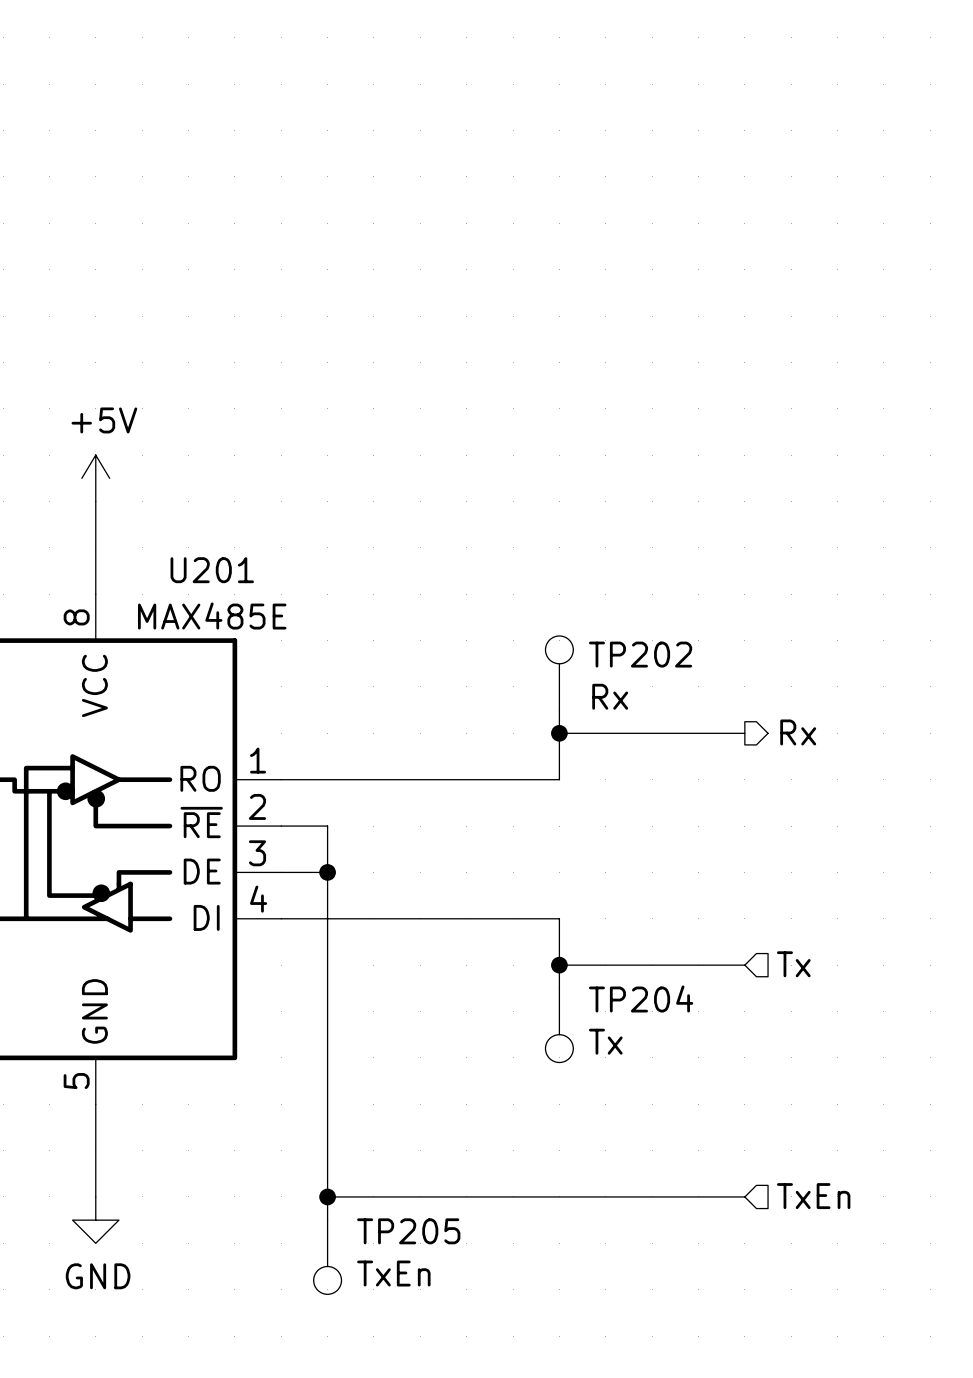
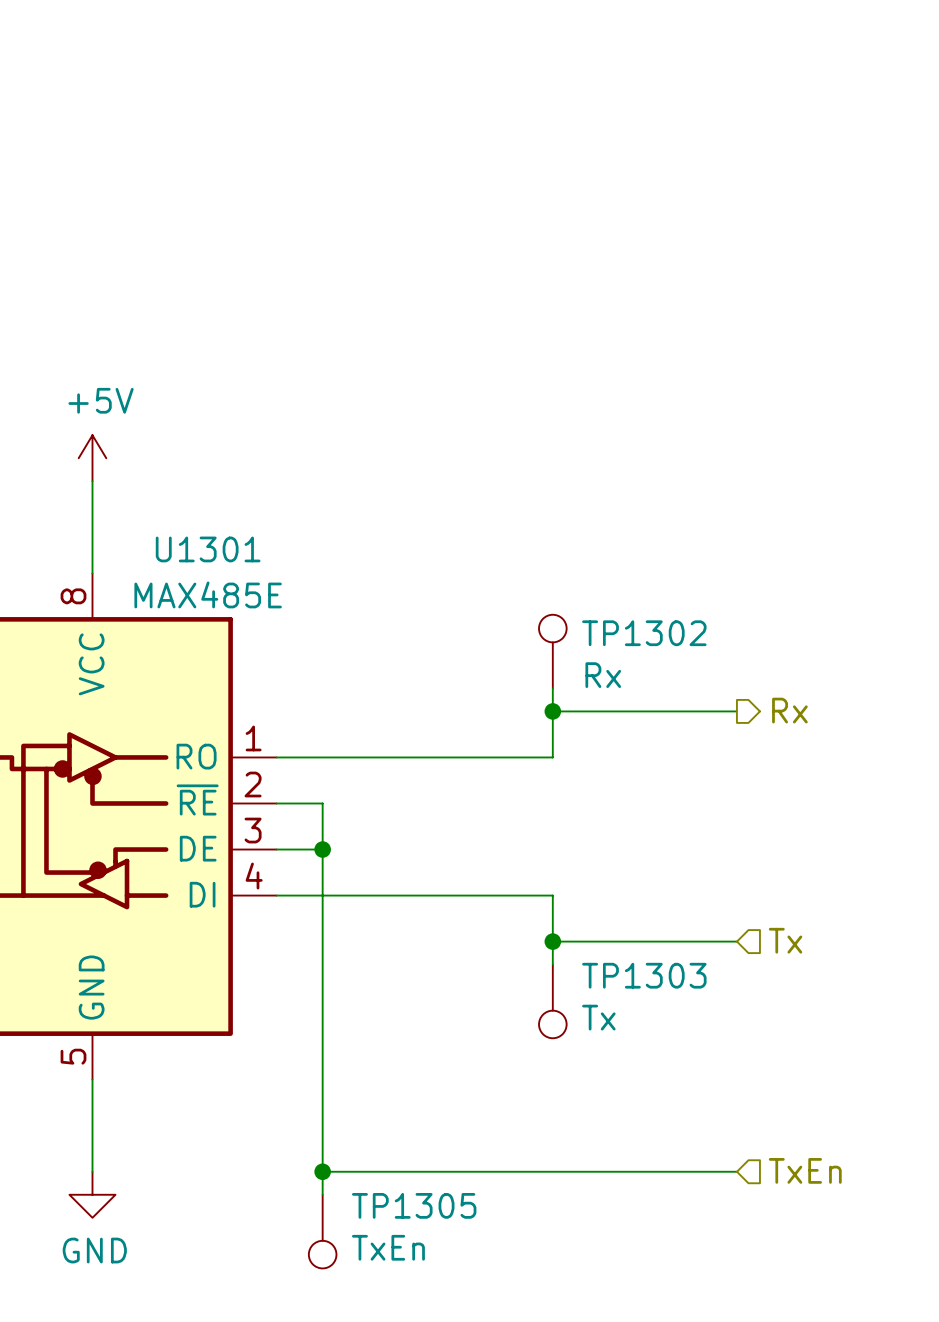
U201 name: U201 (212, 570) -> U1301 (208, 549)
TP202 name: TP202 (640, 654) -> TP1302 (644, 633)
TP204 name: TP204 (641, 998) -> TP1303 (644, 975)
TP205 name: TP205 (408, 1231) -> TP1305 (414, 1205)

